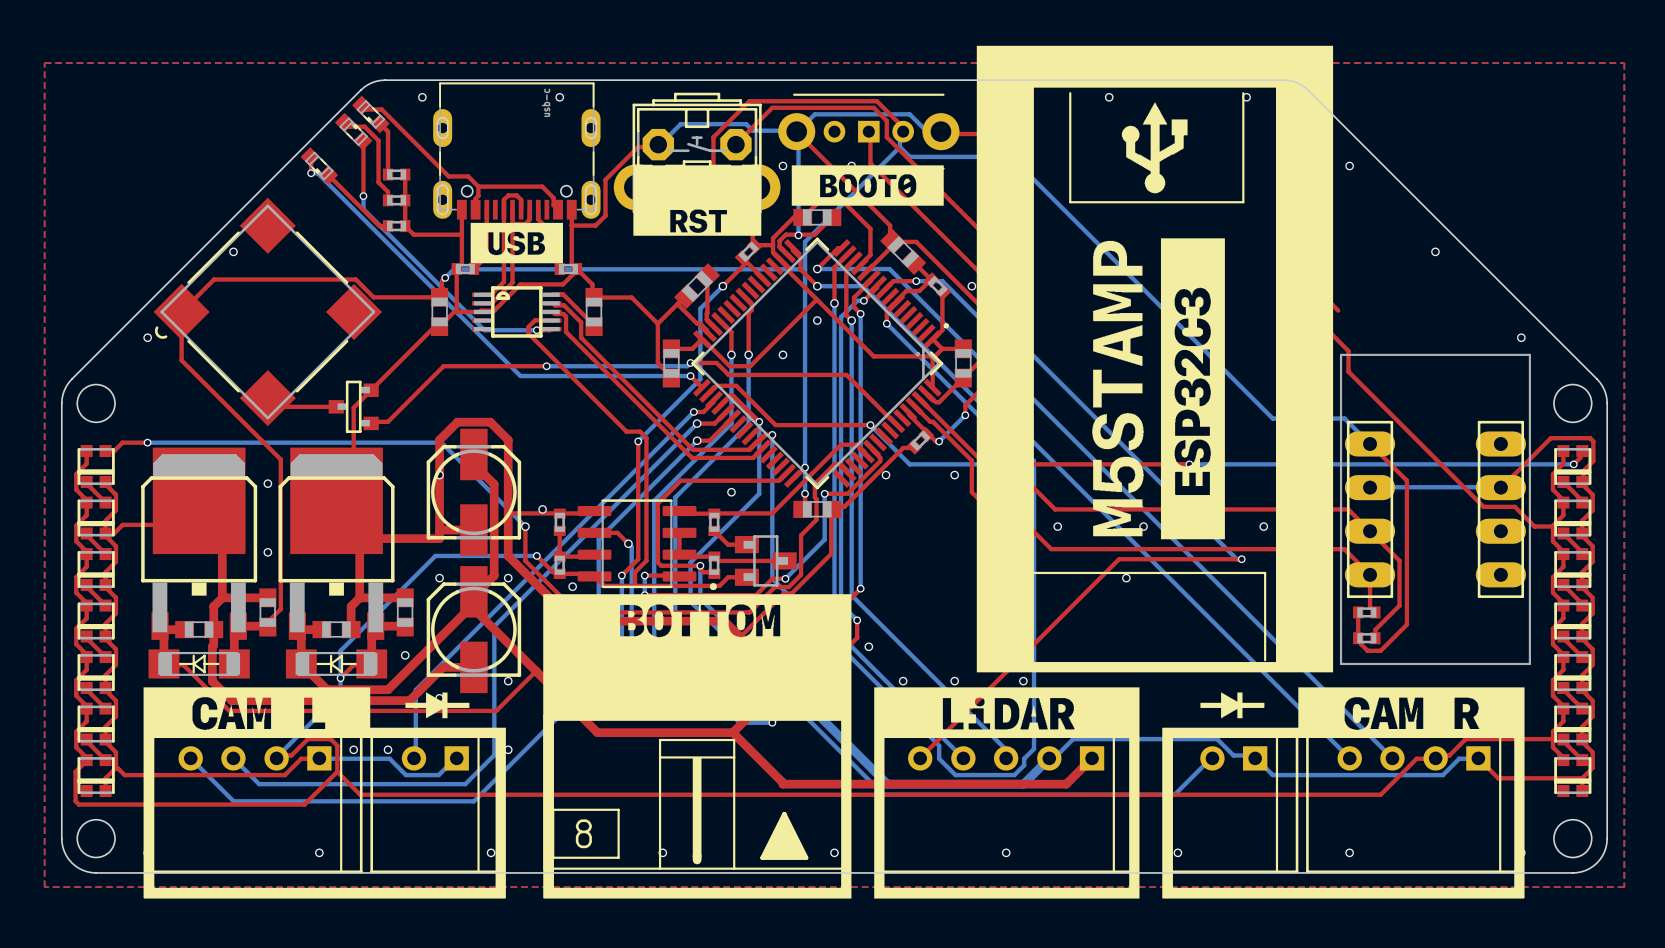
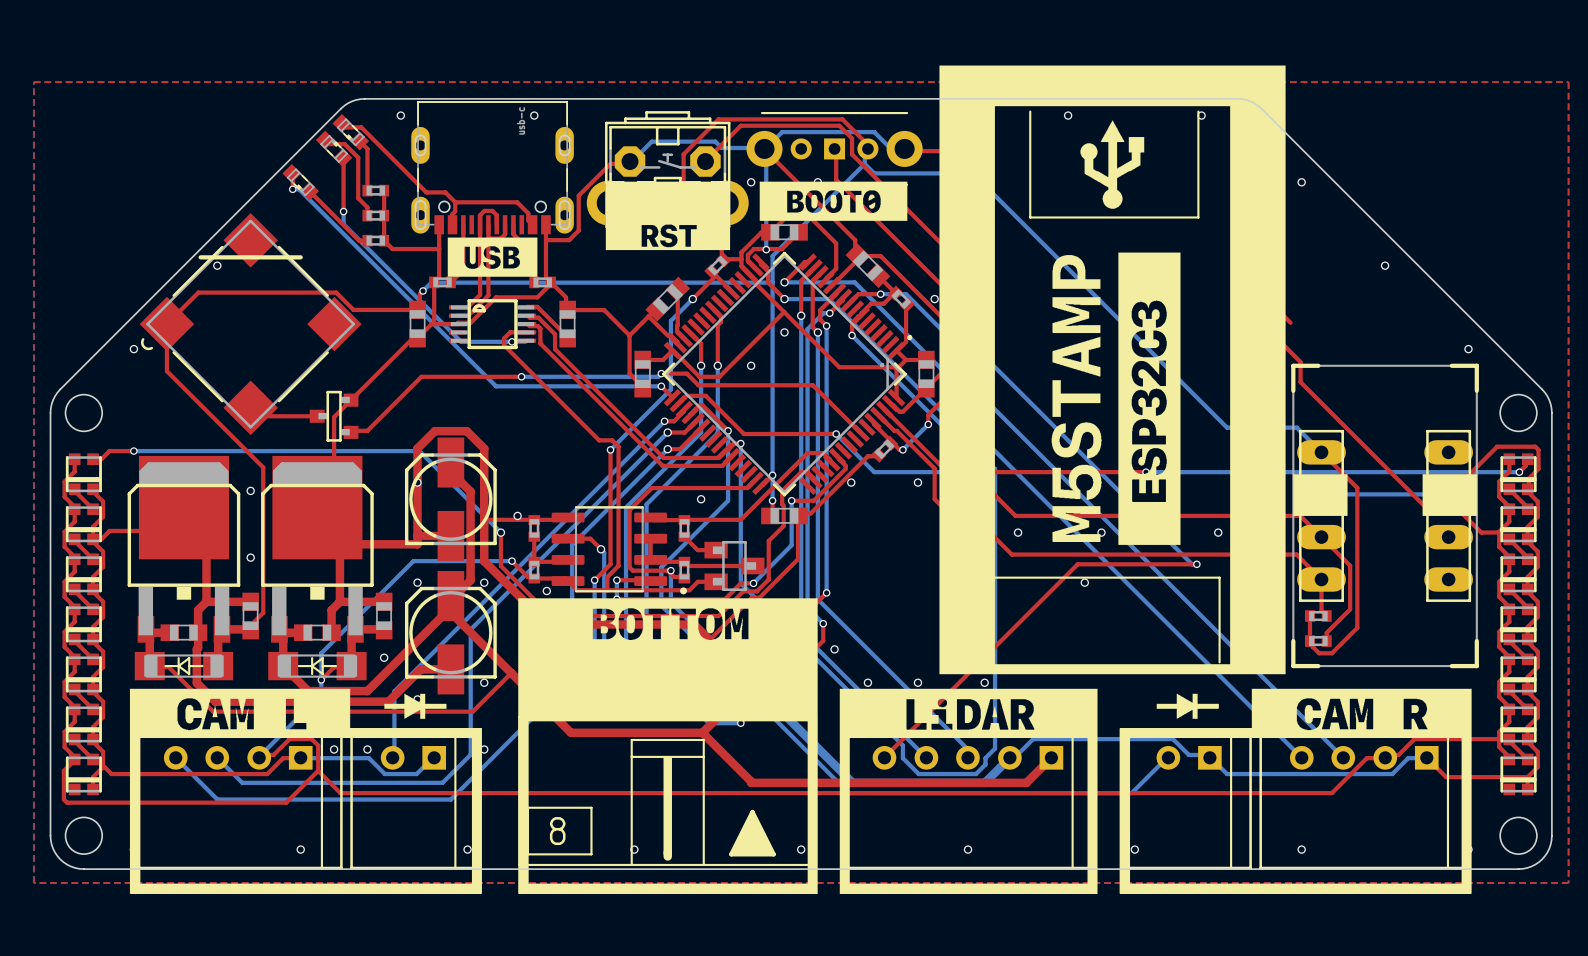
line: none -> (200, 257) (300, 257)
line: none -> (1318, 365) (1293, 365) (1293, 390)
line: none -> (1451, 365) (1476, 365) (1476, 390)
drawing: none -> [1293, 474, 1348, 516]
drawing: none -> [1422, 474, 1477, 516]
line: none -> (1293, 641) (1293, 666) (1318, 666)
line: none -> (1476, 641) (1476, 666) (1451, 666)

